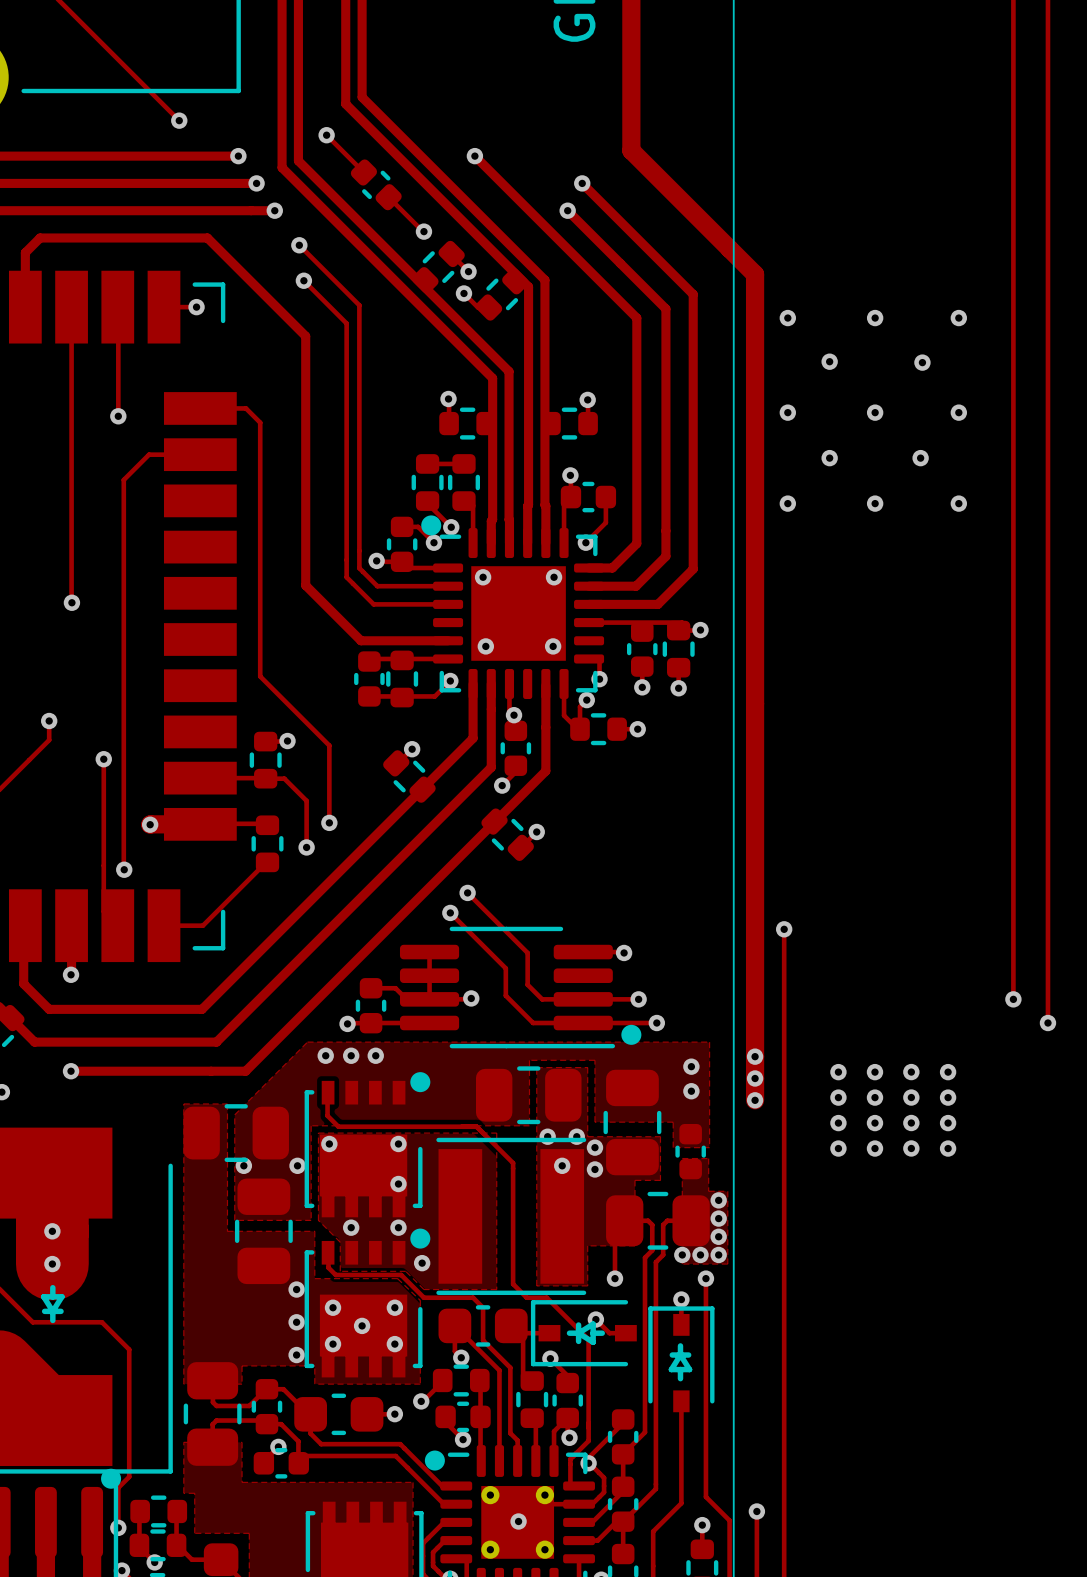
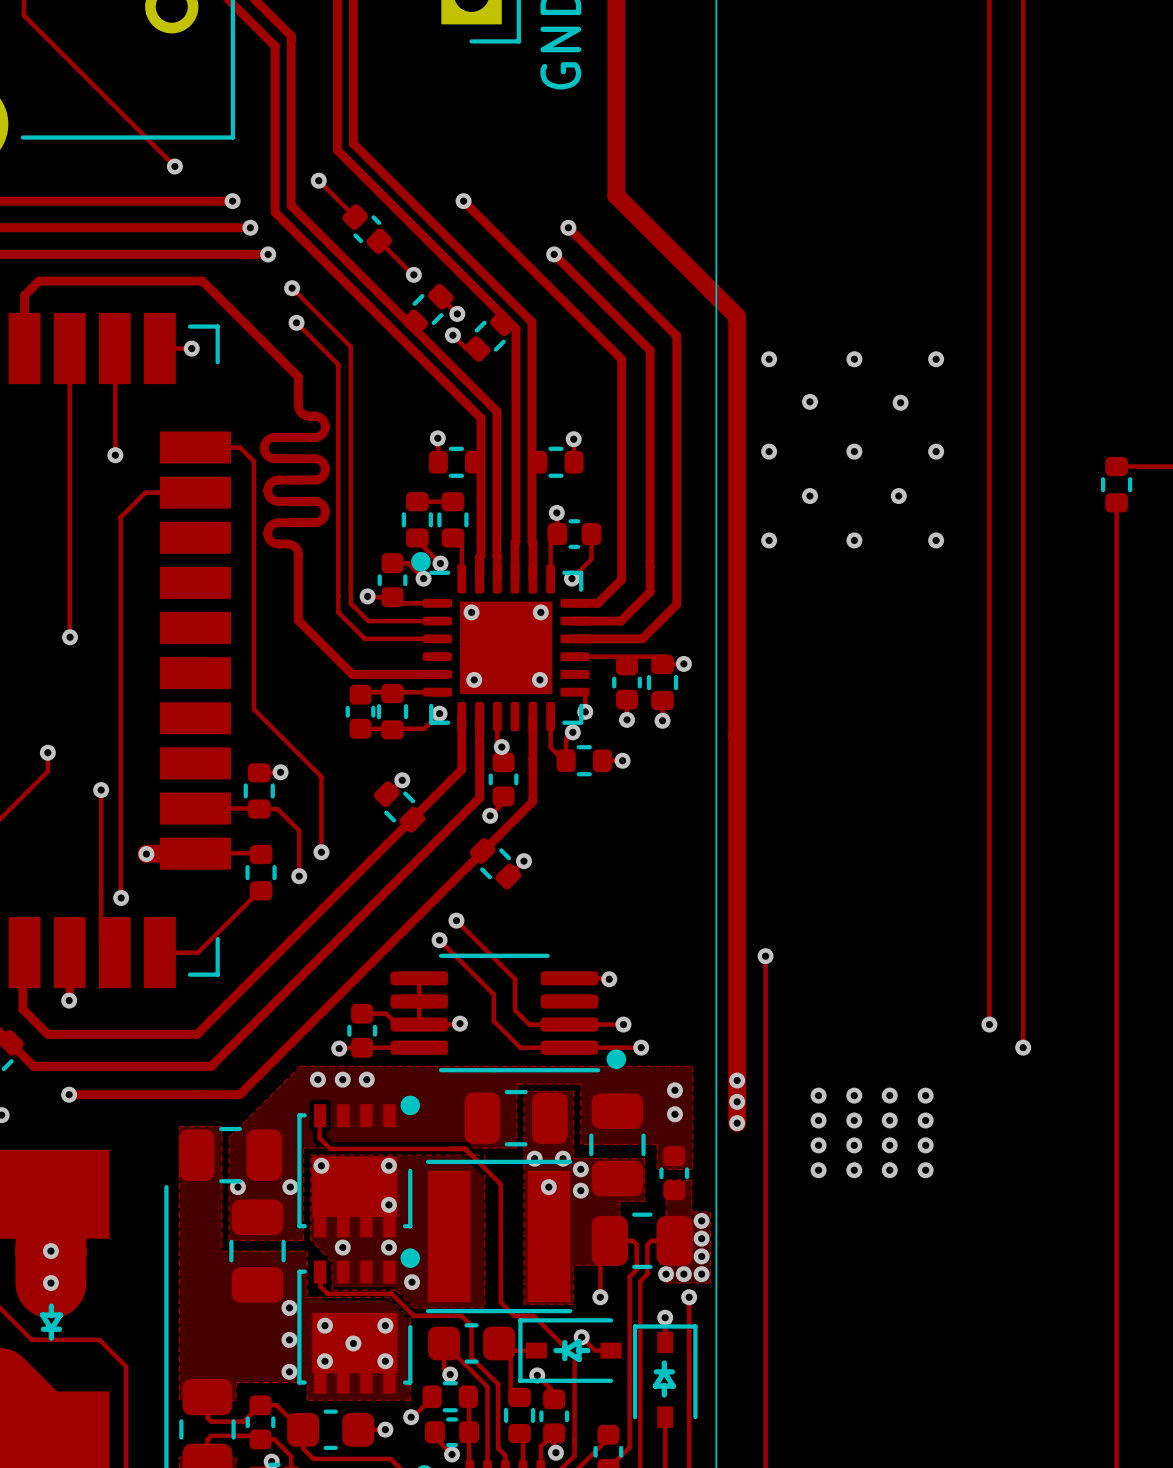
track: (305, 365) (305, 518) -> (298, 405) (303, 414) (317, 416) (322, 419) (325, 426) (323, 433) (316, 437) (272, 437) (266, 441) (264, 448) (266, 454) (272, 458) (316, 458) (322, 461) (325, 466) (324, 473) (318, 479) (277, 480) (271, 482) (268, 487) (268, 494) (274, 500) (316, 501) (324, 507) (324, 516) (318, 521) (277, 522) (269, 528) (267, 534) (270, 540) (275, 543) (293, 545) (298, 554)

